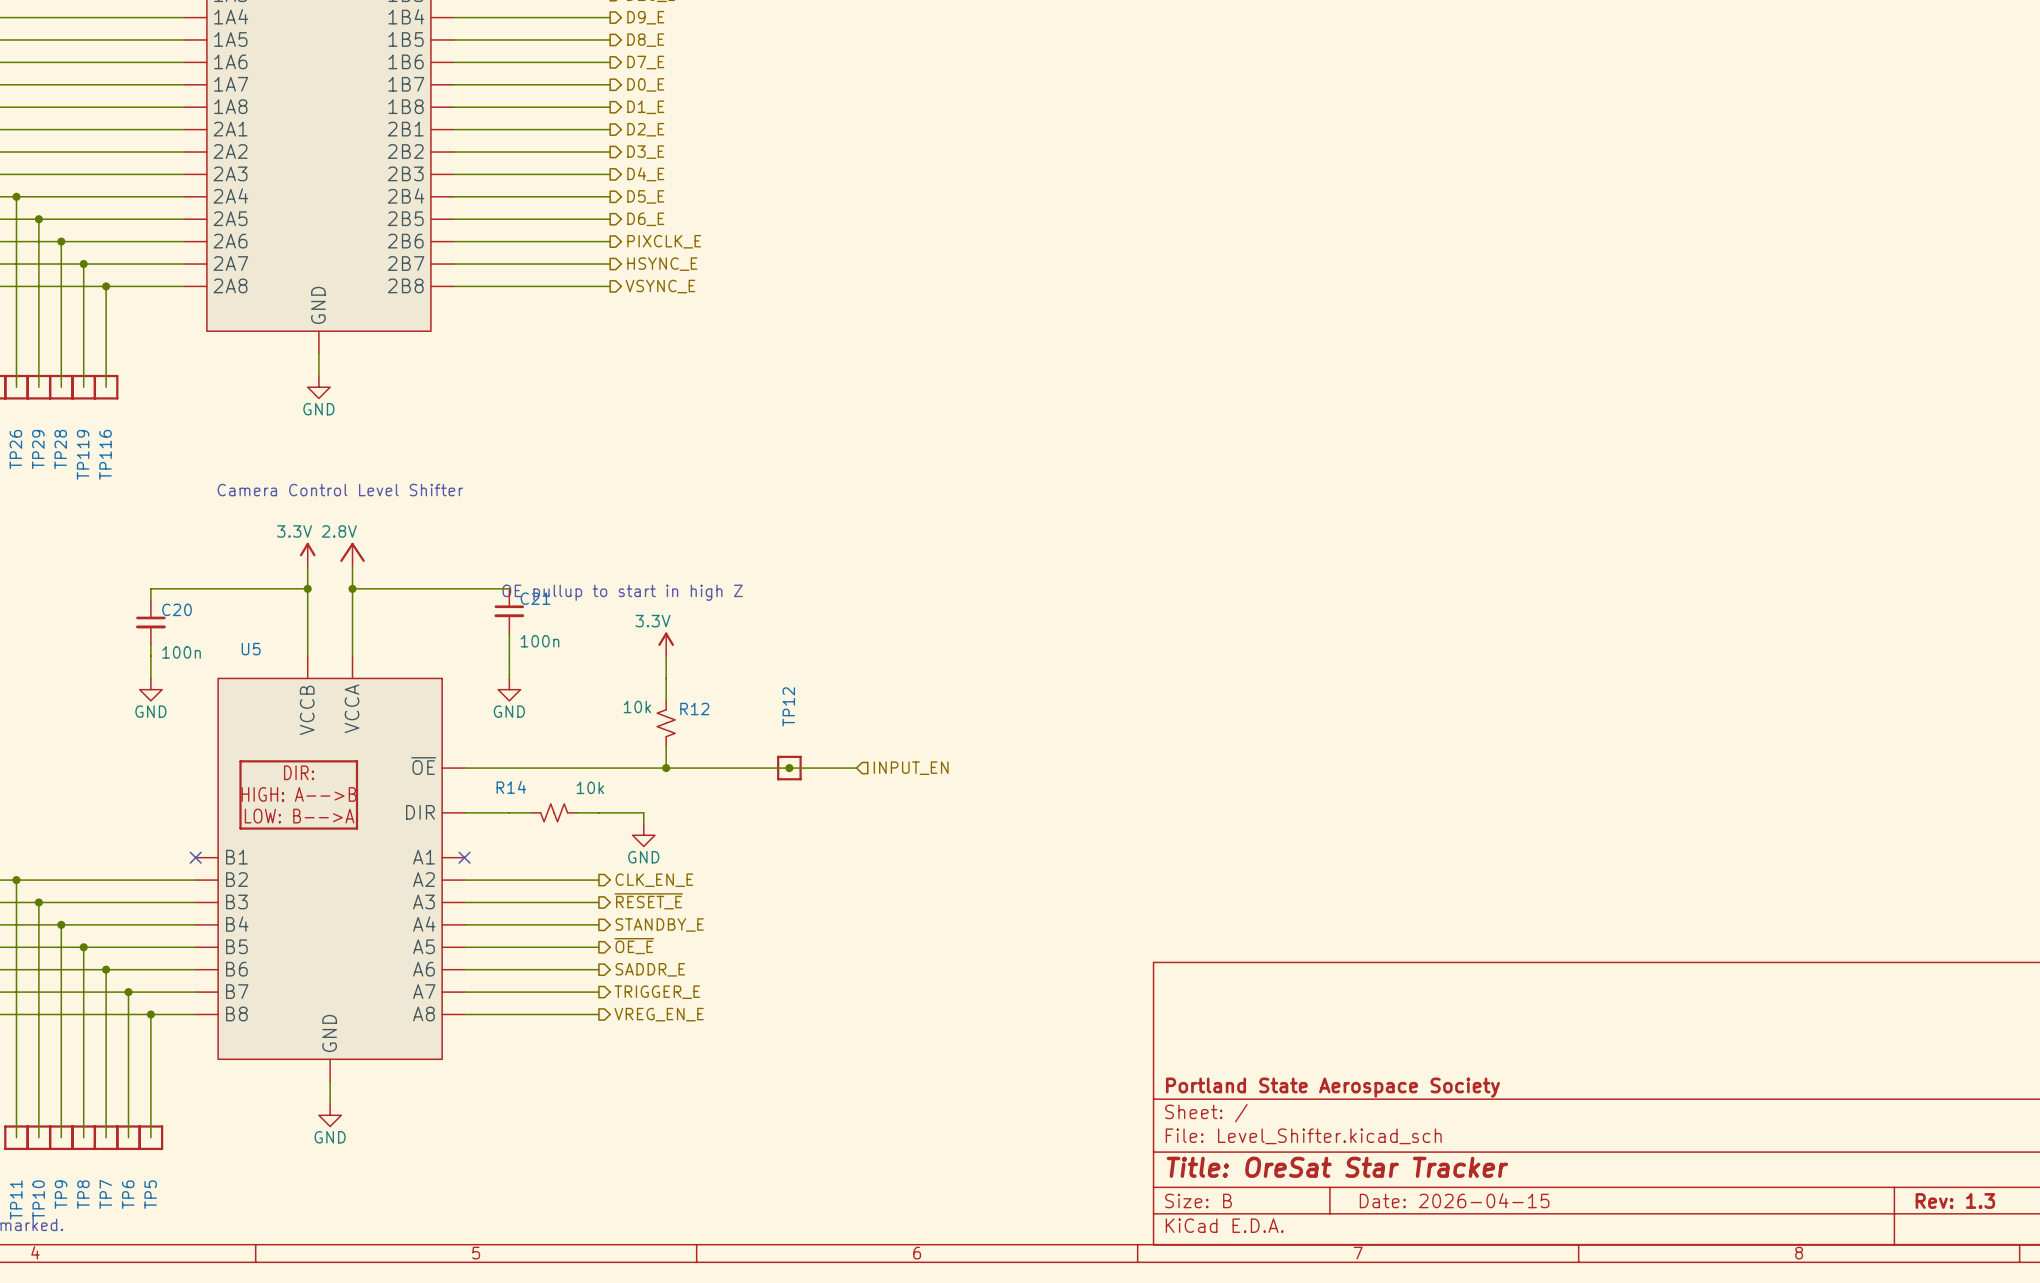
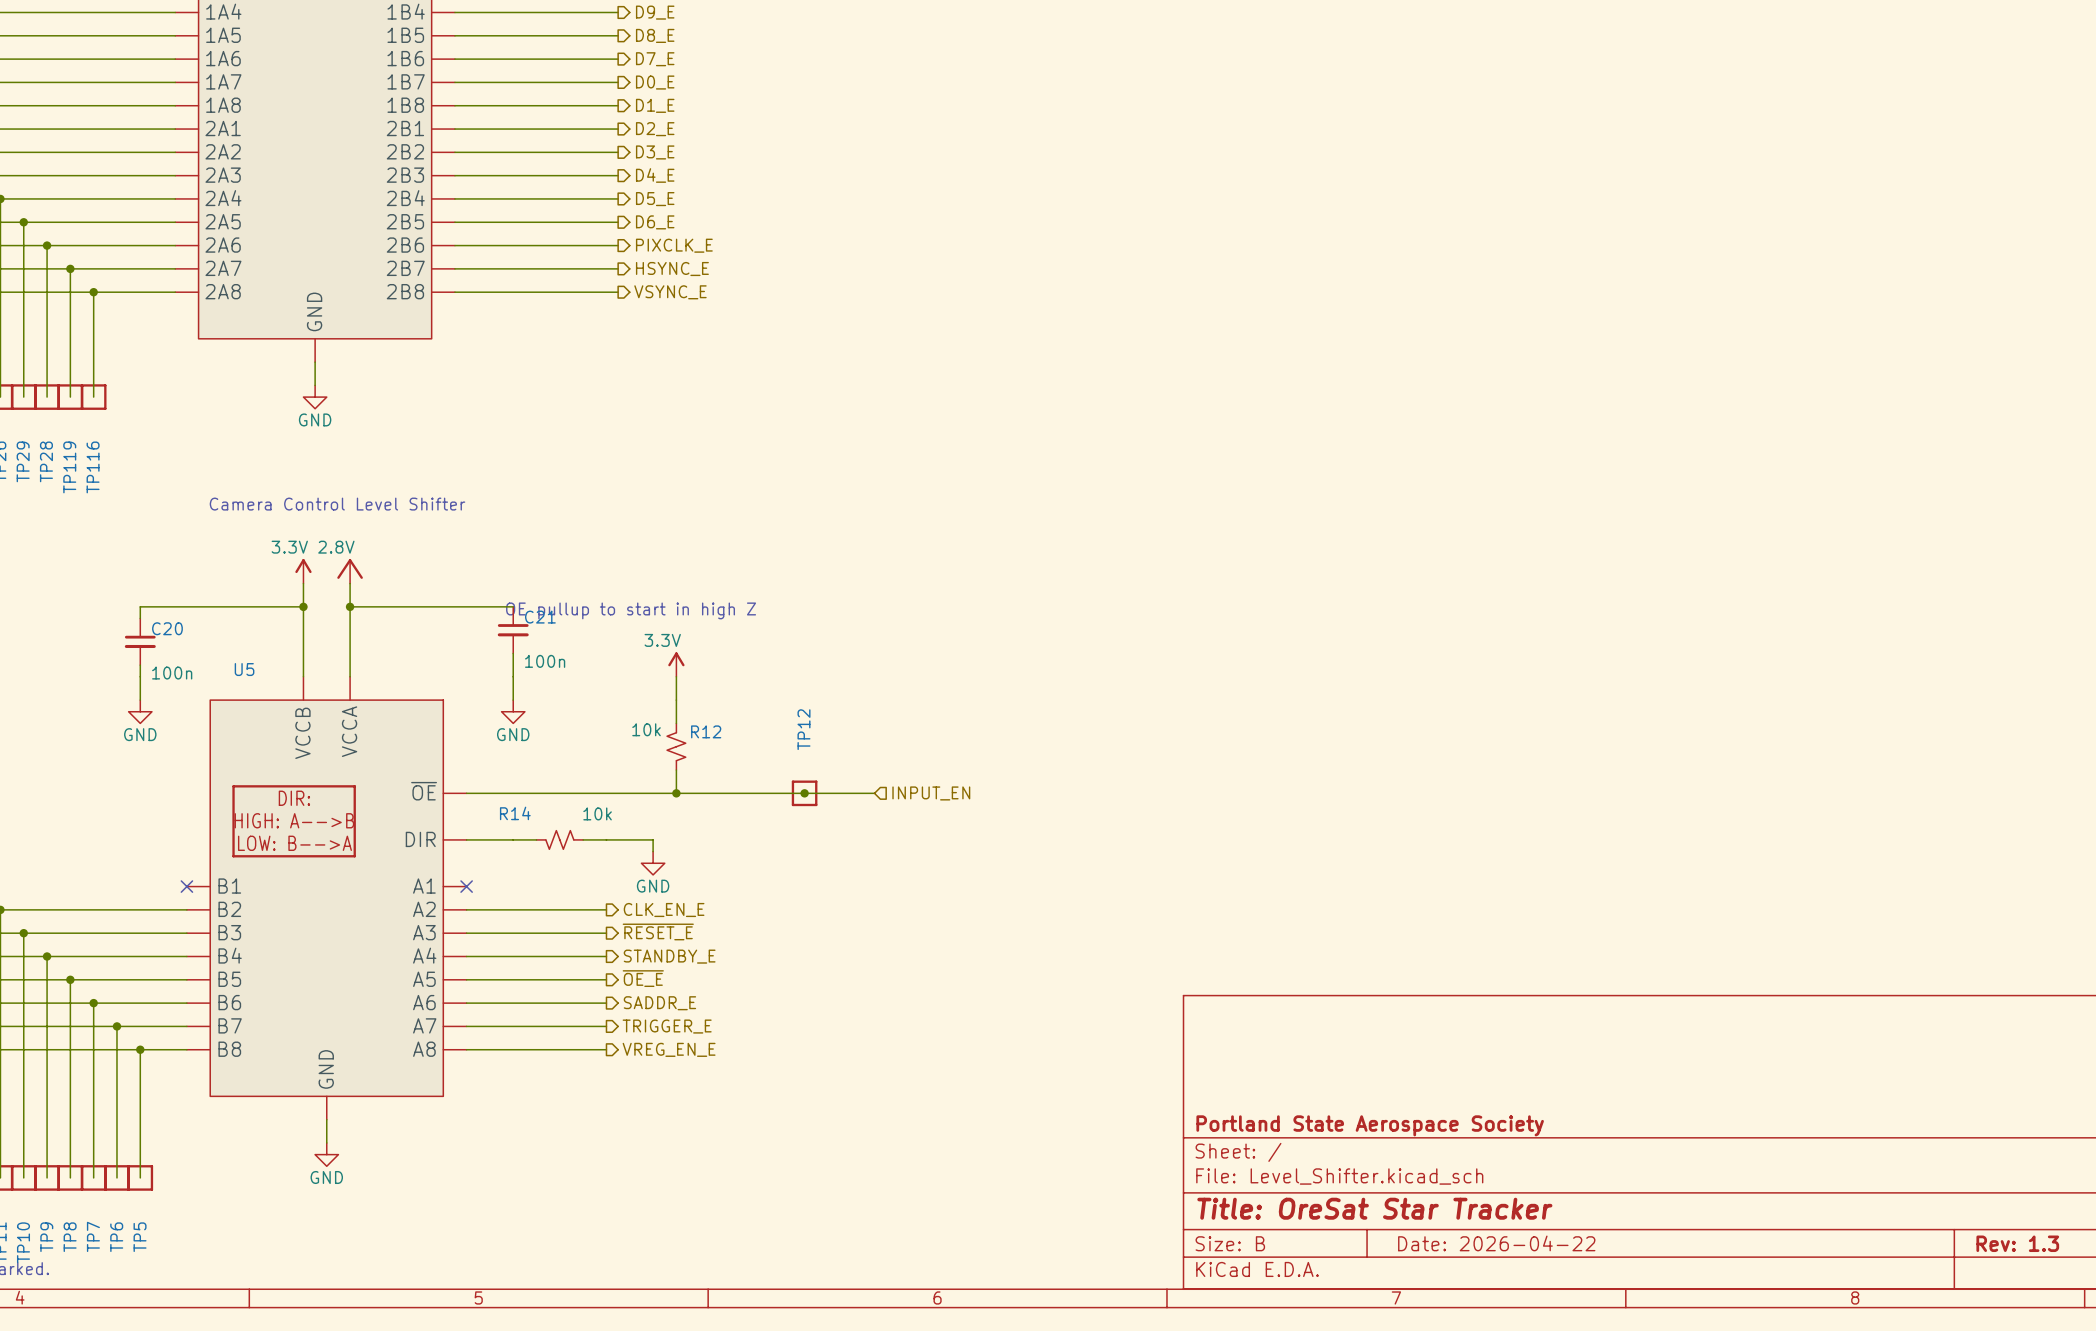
title block: Date: 2026-04-15 (1454, 1200) -> Date: 2026-04-22 (1496, 1243)

